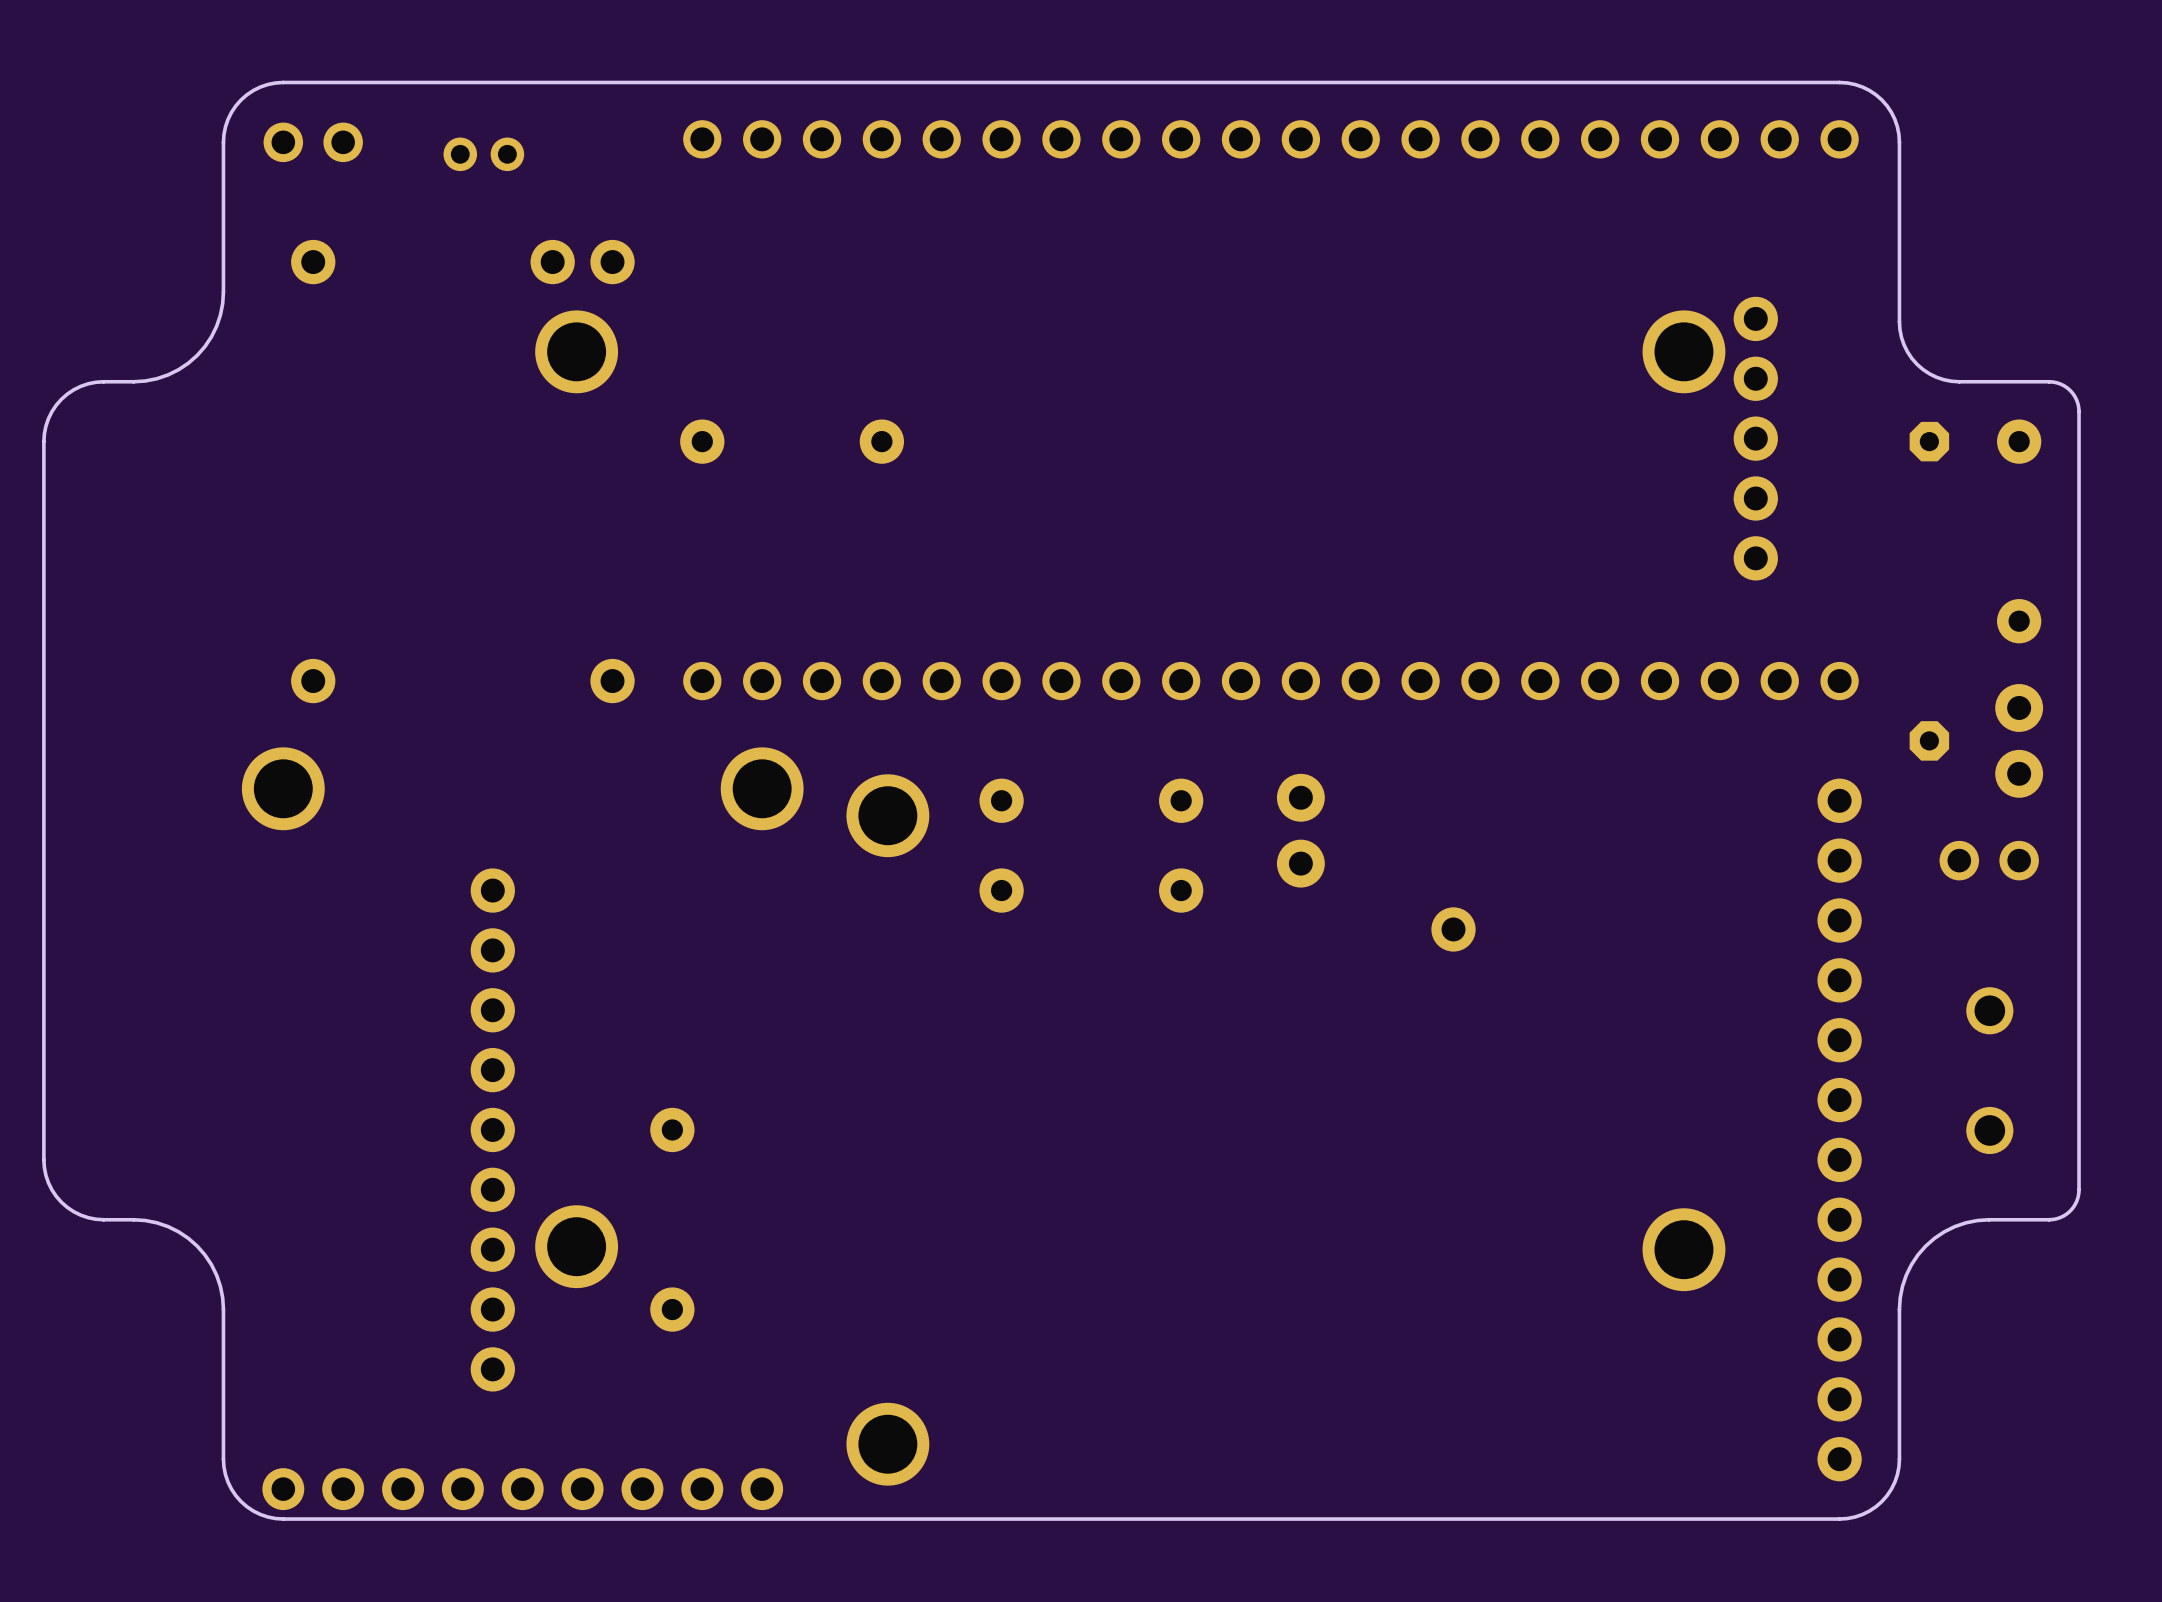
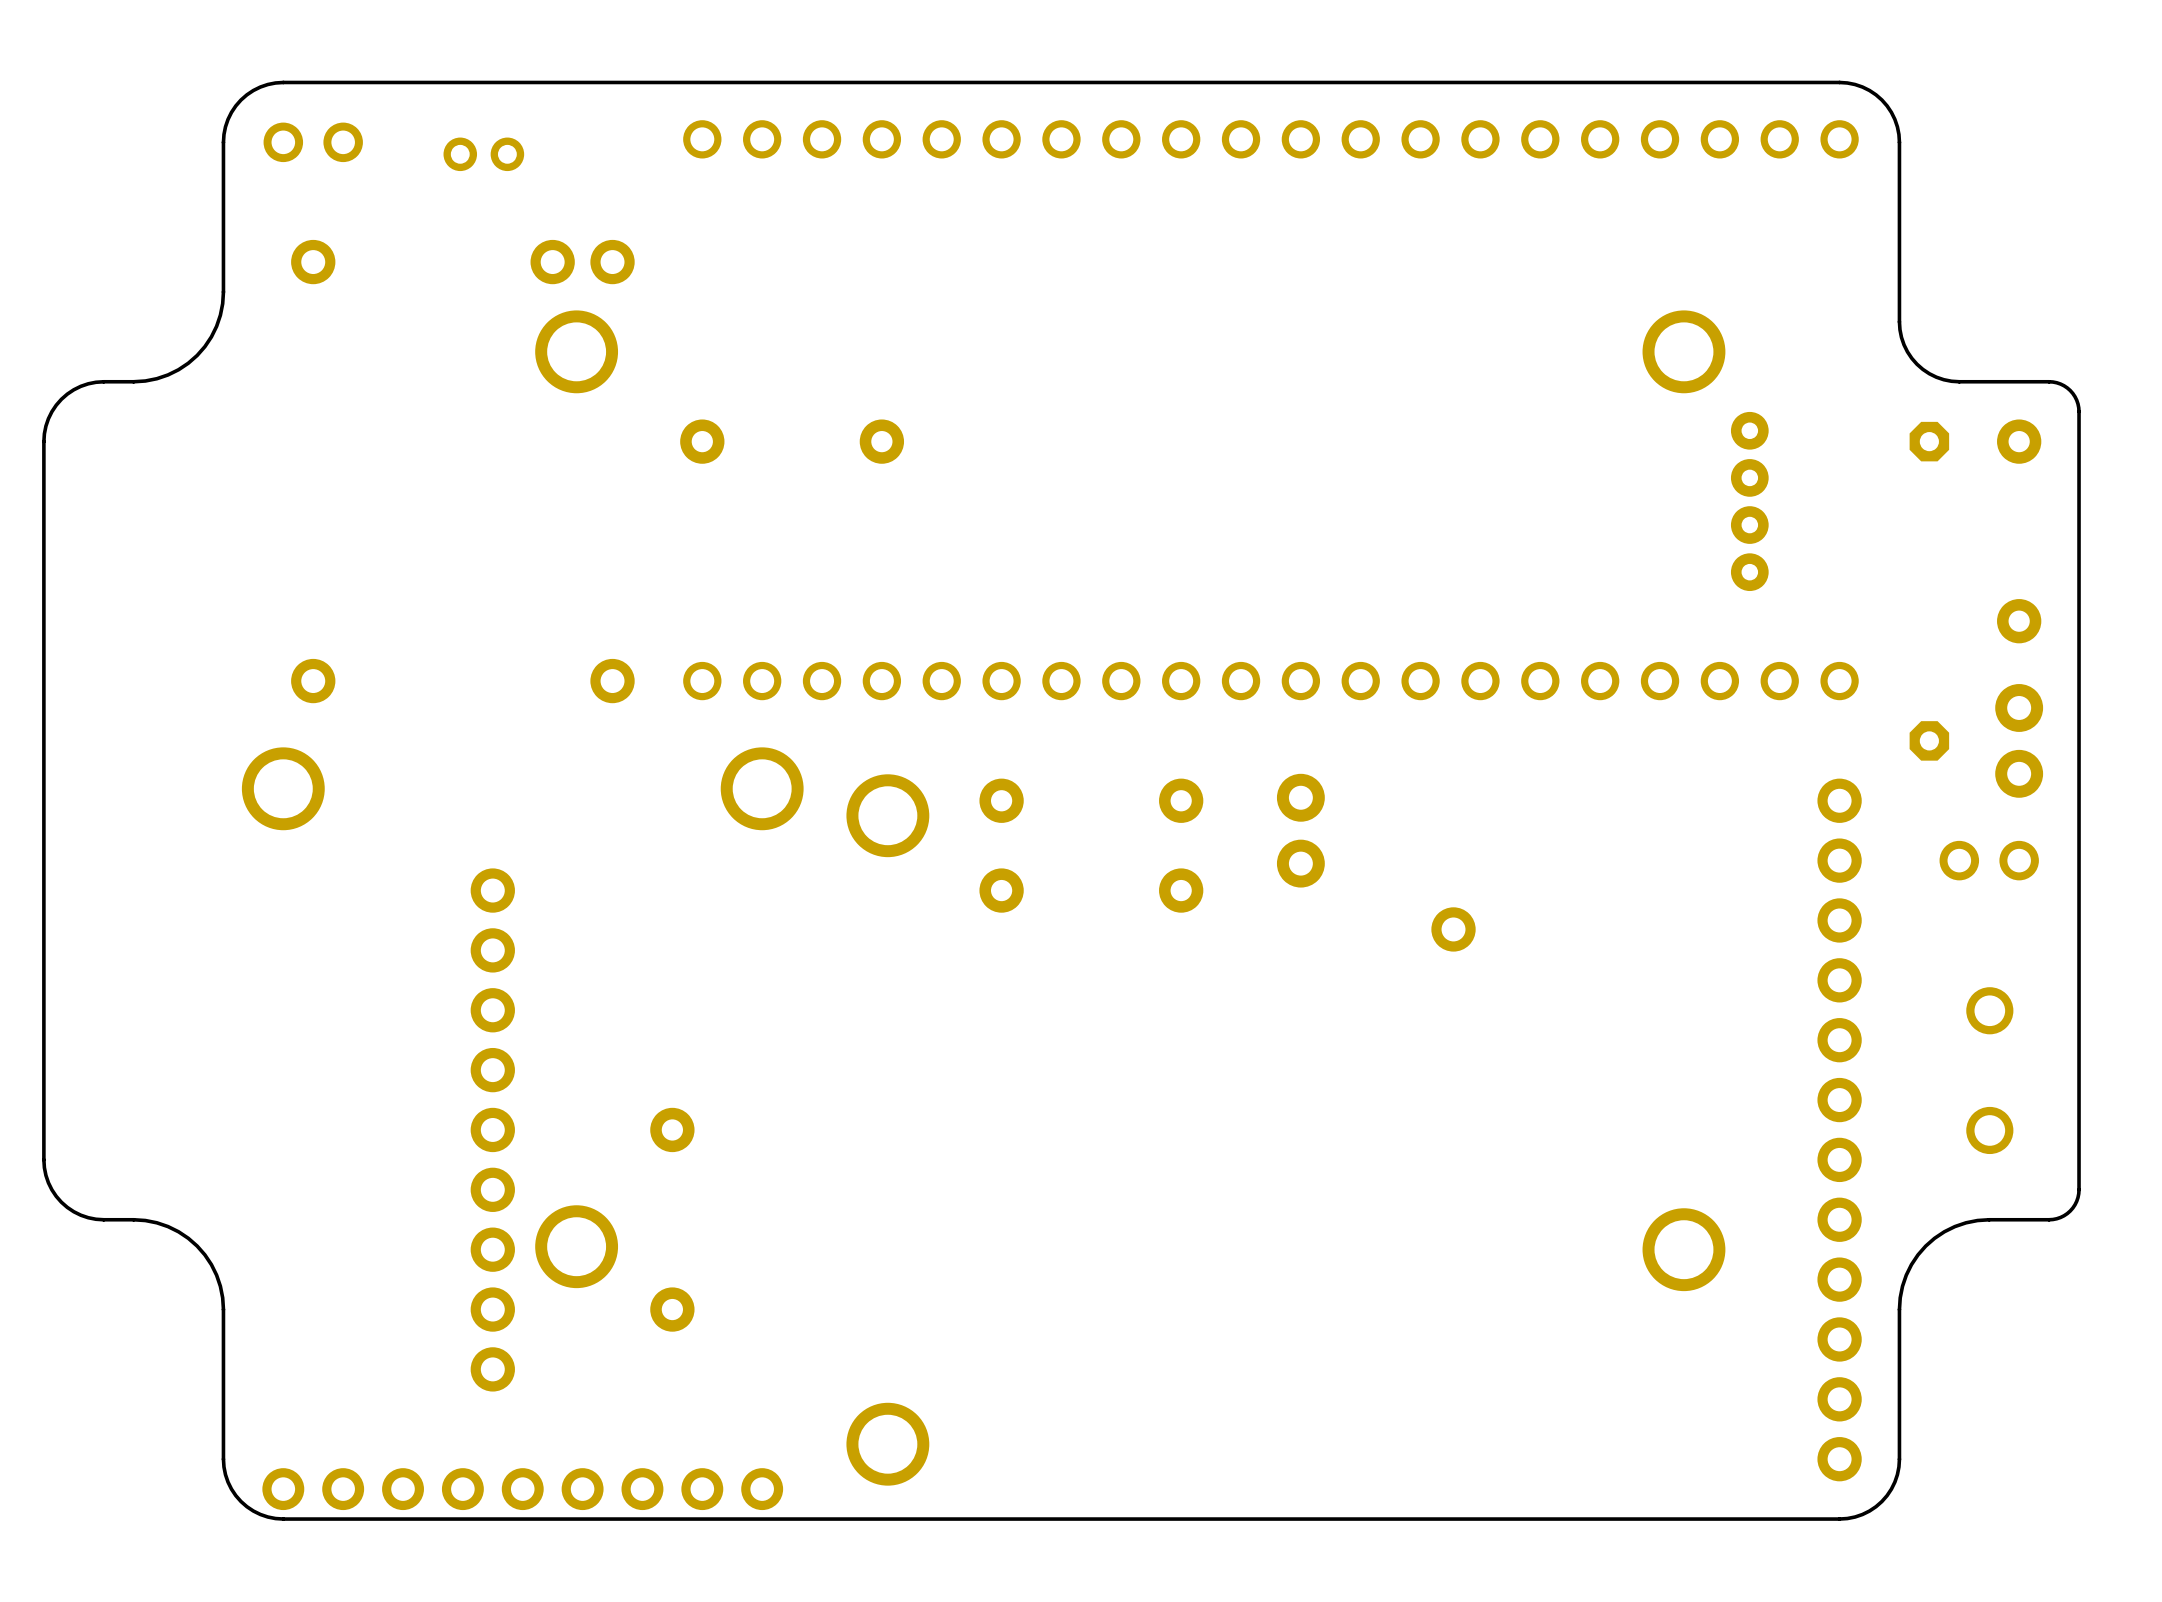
part: (1755, 438) -> none
part: none -> (1749, 501)

